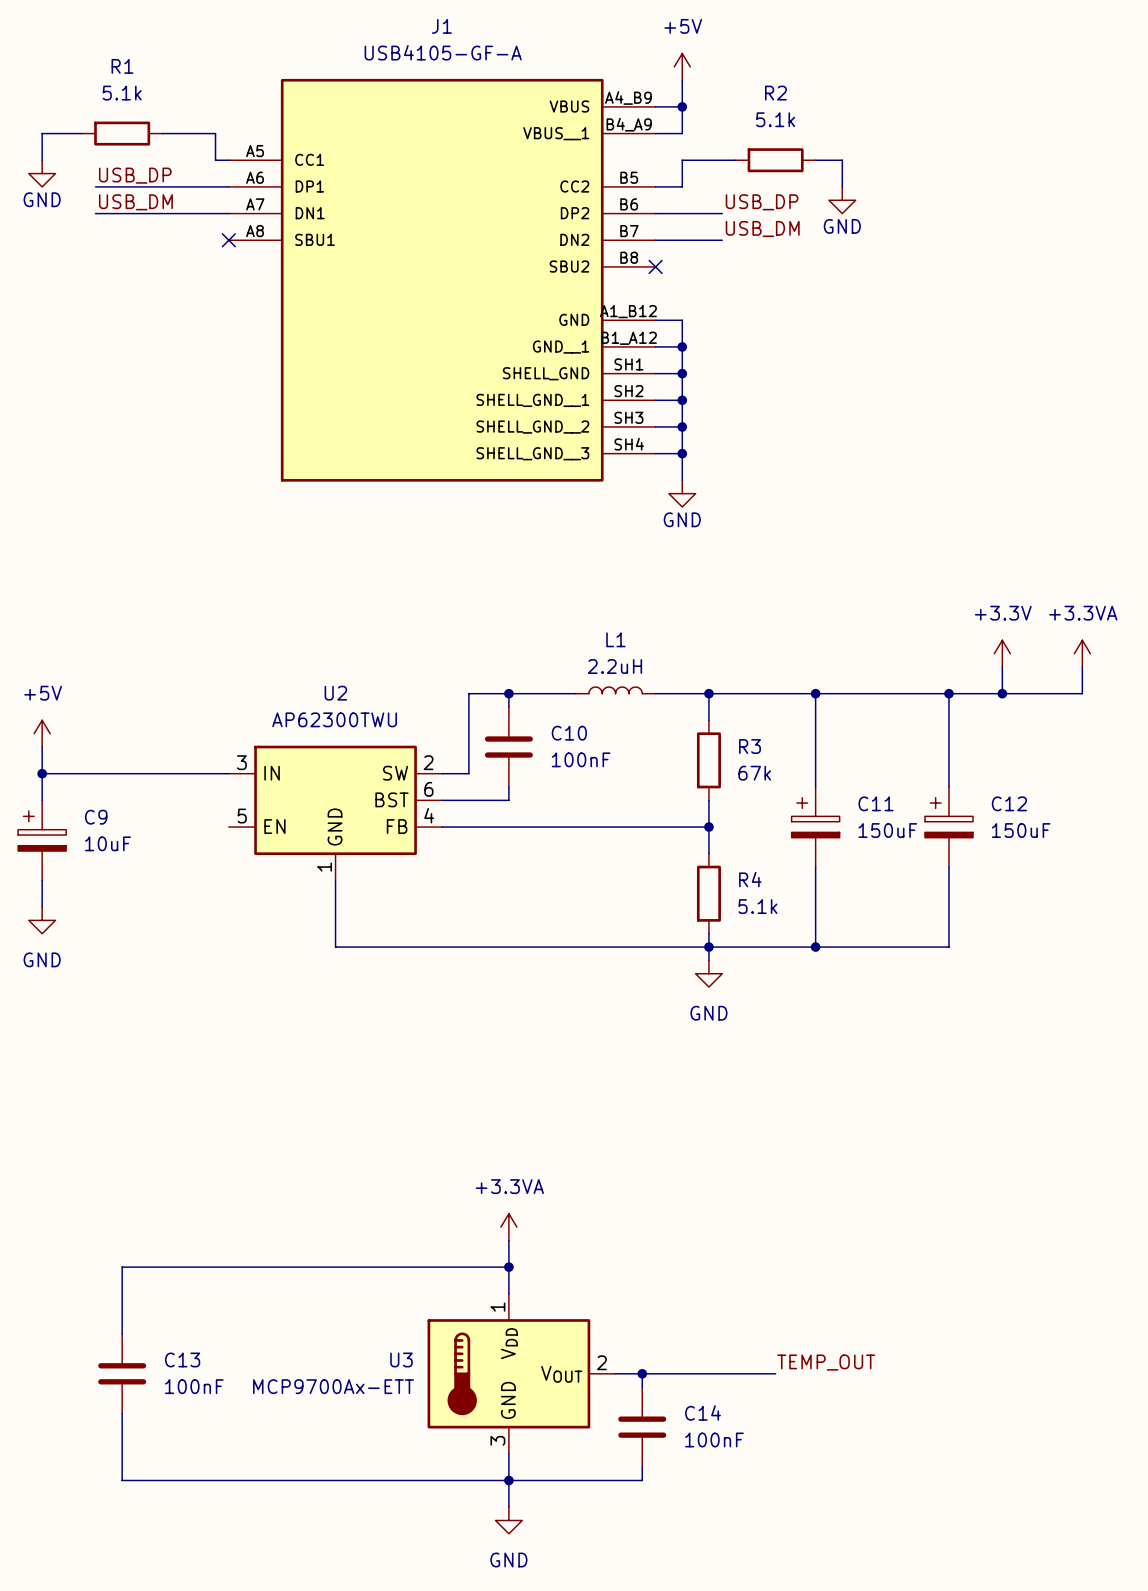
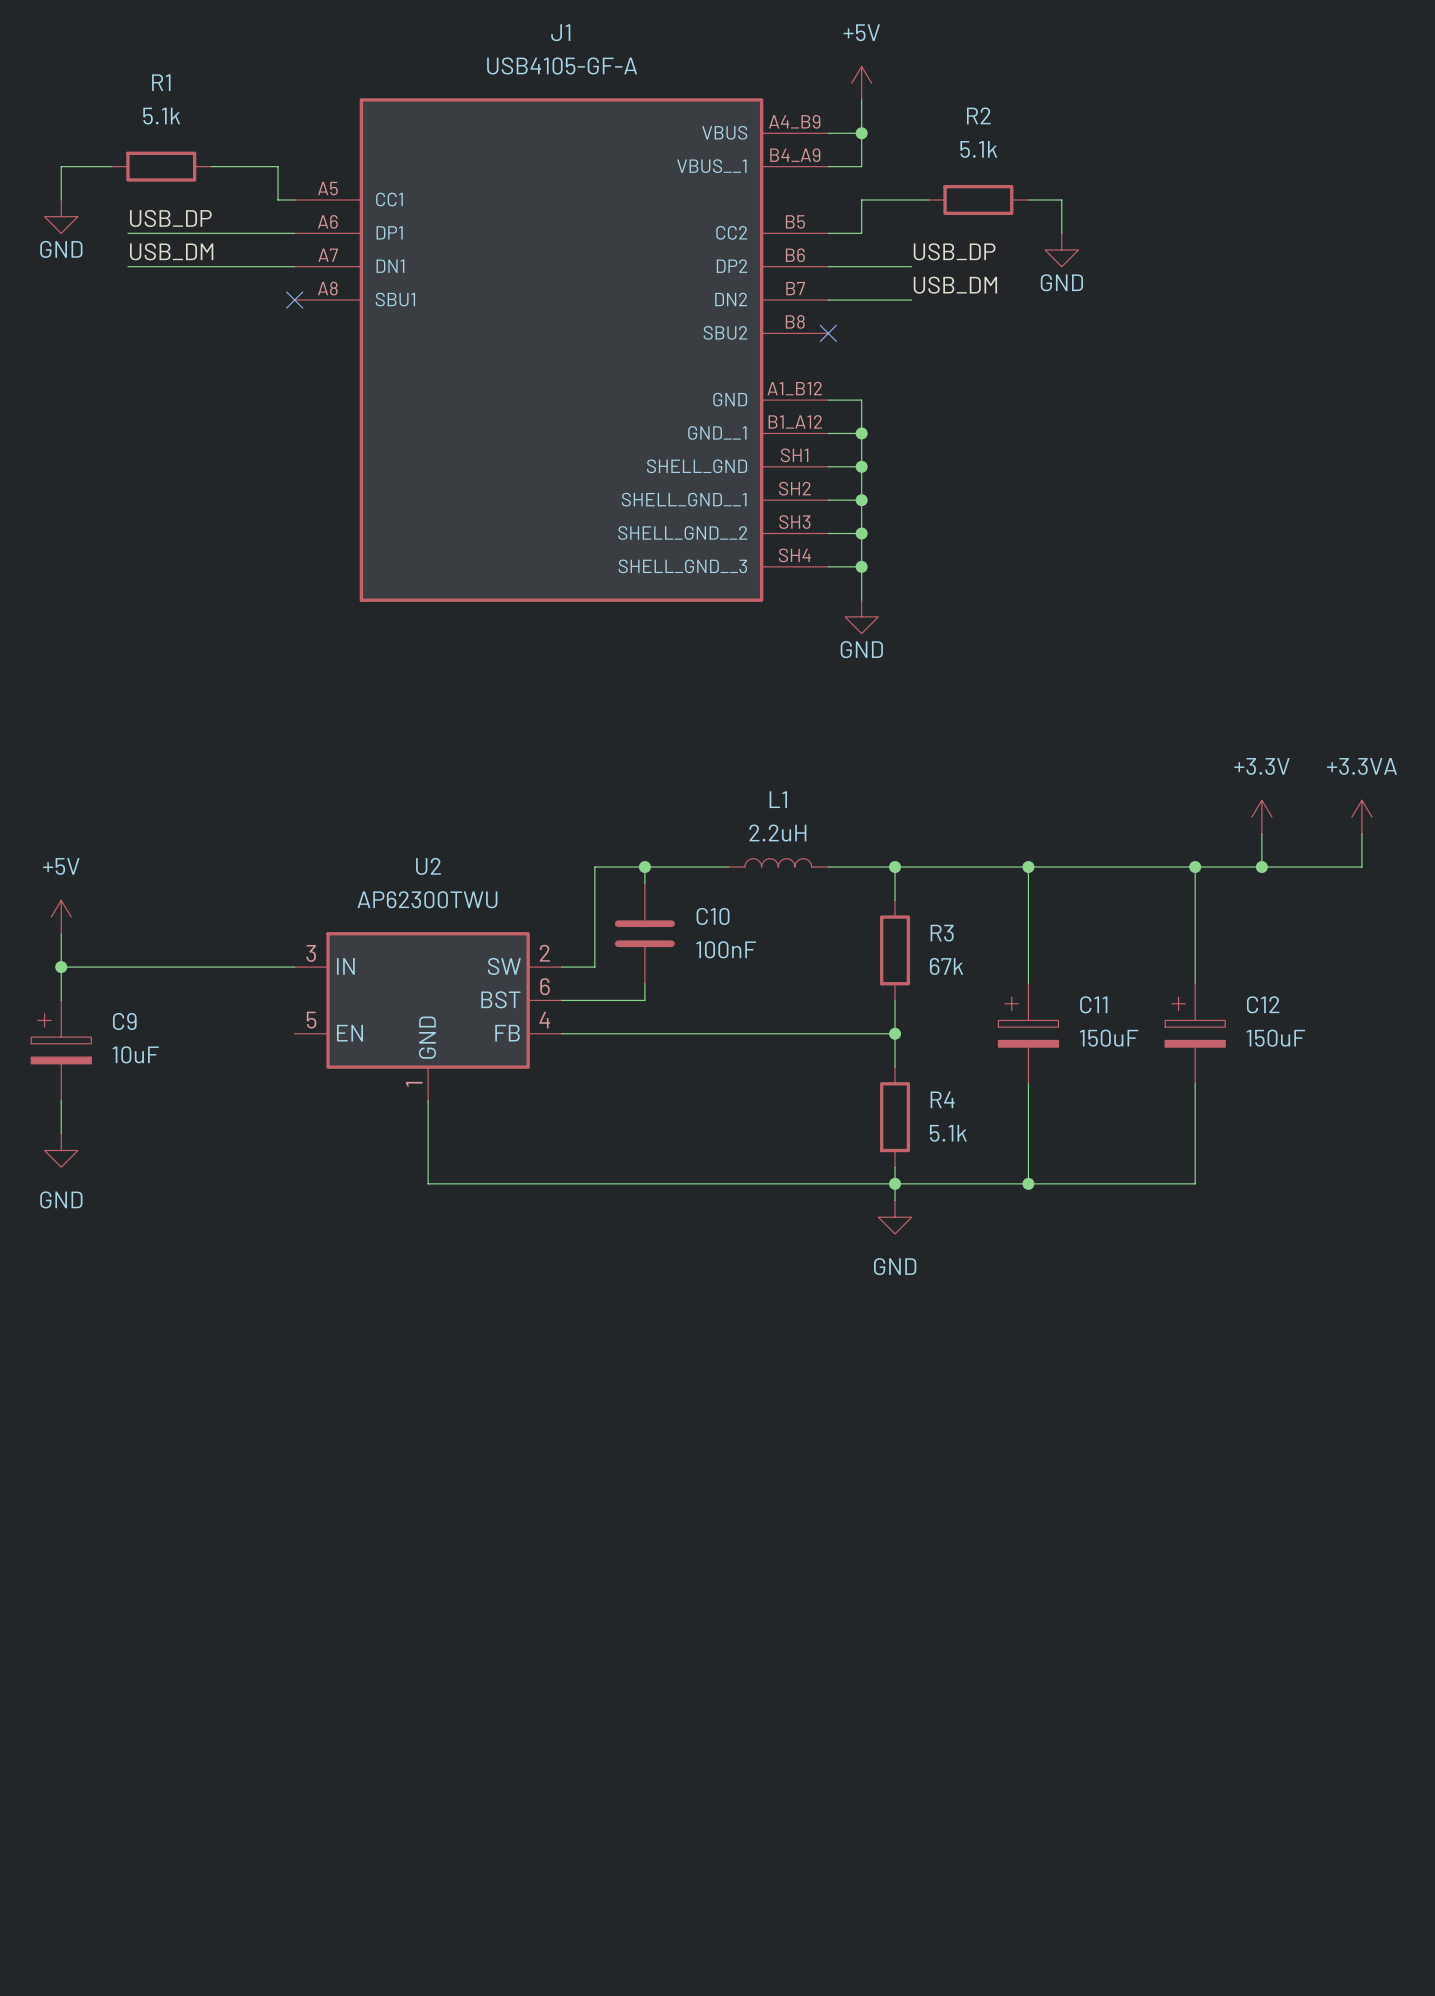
power symbol: +3.3VA (508, 1227) -> none
wire: (508, 1240) (508, 1293) -> none
wire: (508, 1267) (122, 1267) (122, 1333) -> none
junction: (508, 1267) -> none
label: TEMP_OUT (826, 1362) -> none
C13: 100nF (122, 1373) -> none
U3: MCP9700Ax-ETT (521, 1373) -> none
wire: (615, 1373) (775, 1373) -> none
wire: (642, 1373) (642, 1387) -> none
junction: (642, 1373) -> none
wire: (122, 1413) (122, 1480) (642, 1480) (642, 1467) -> none
C14: 100nF (642, 1427) -> none
wire: (508, 1453) (508, 1507) -> none
junction: (508, 1480) -> none
power symbol: GND (508, 1520) -> none

